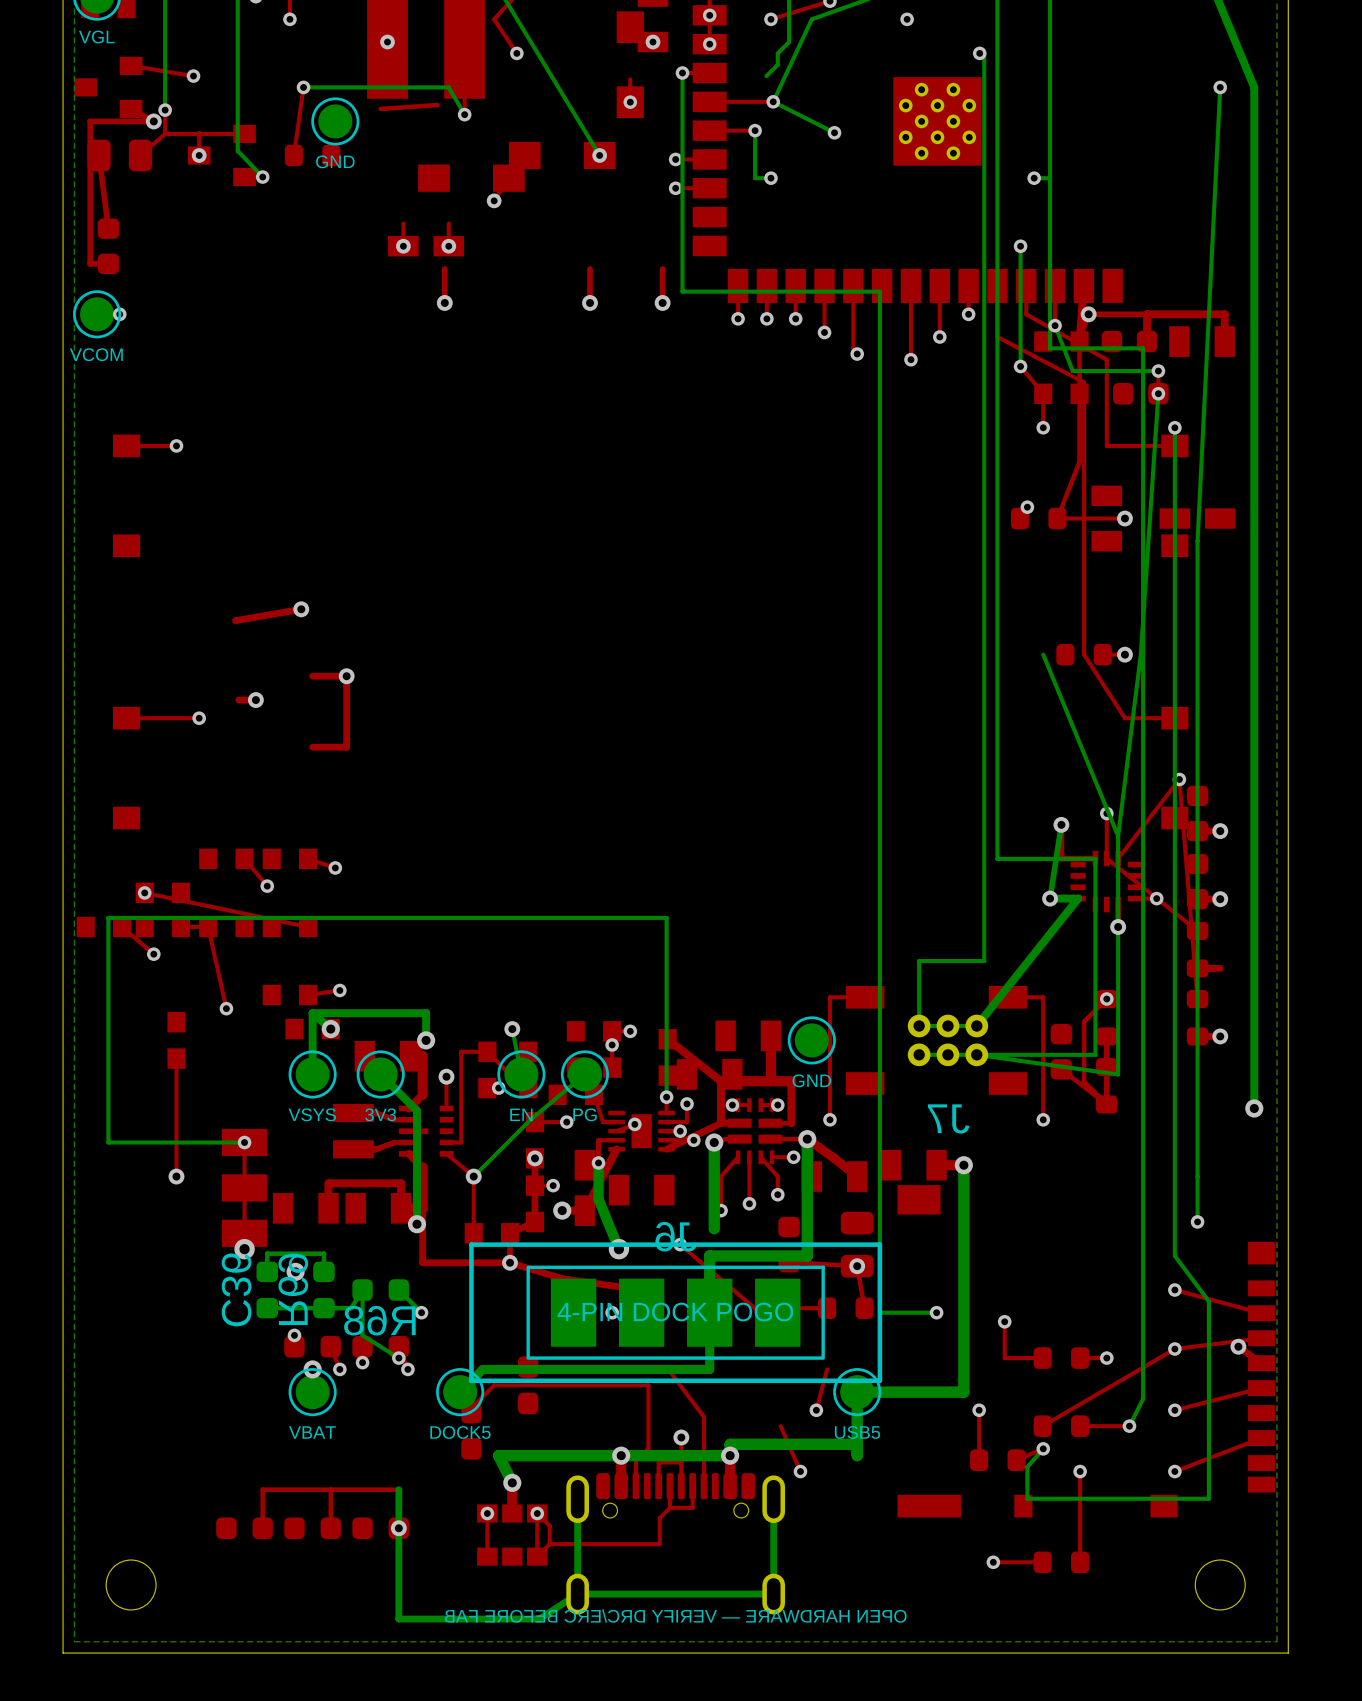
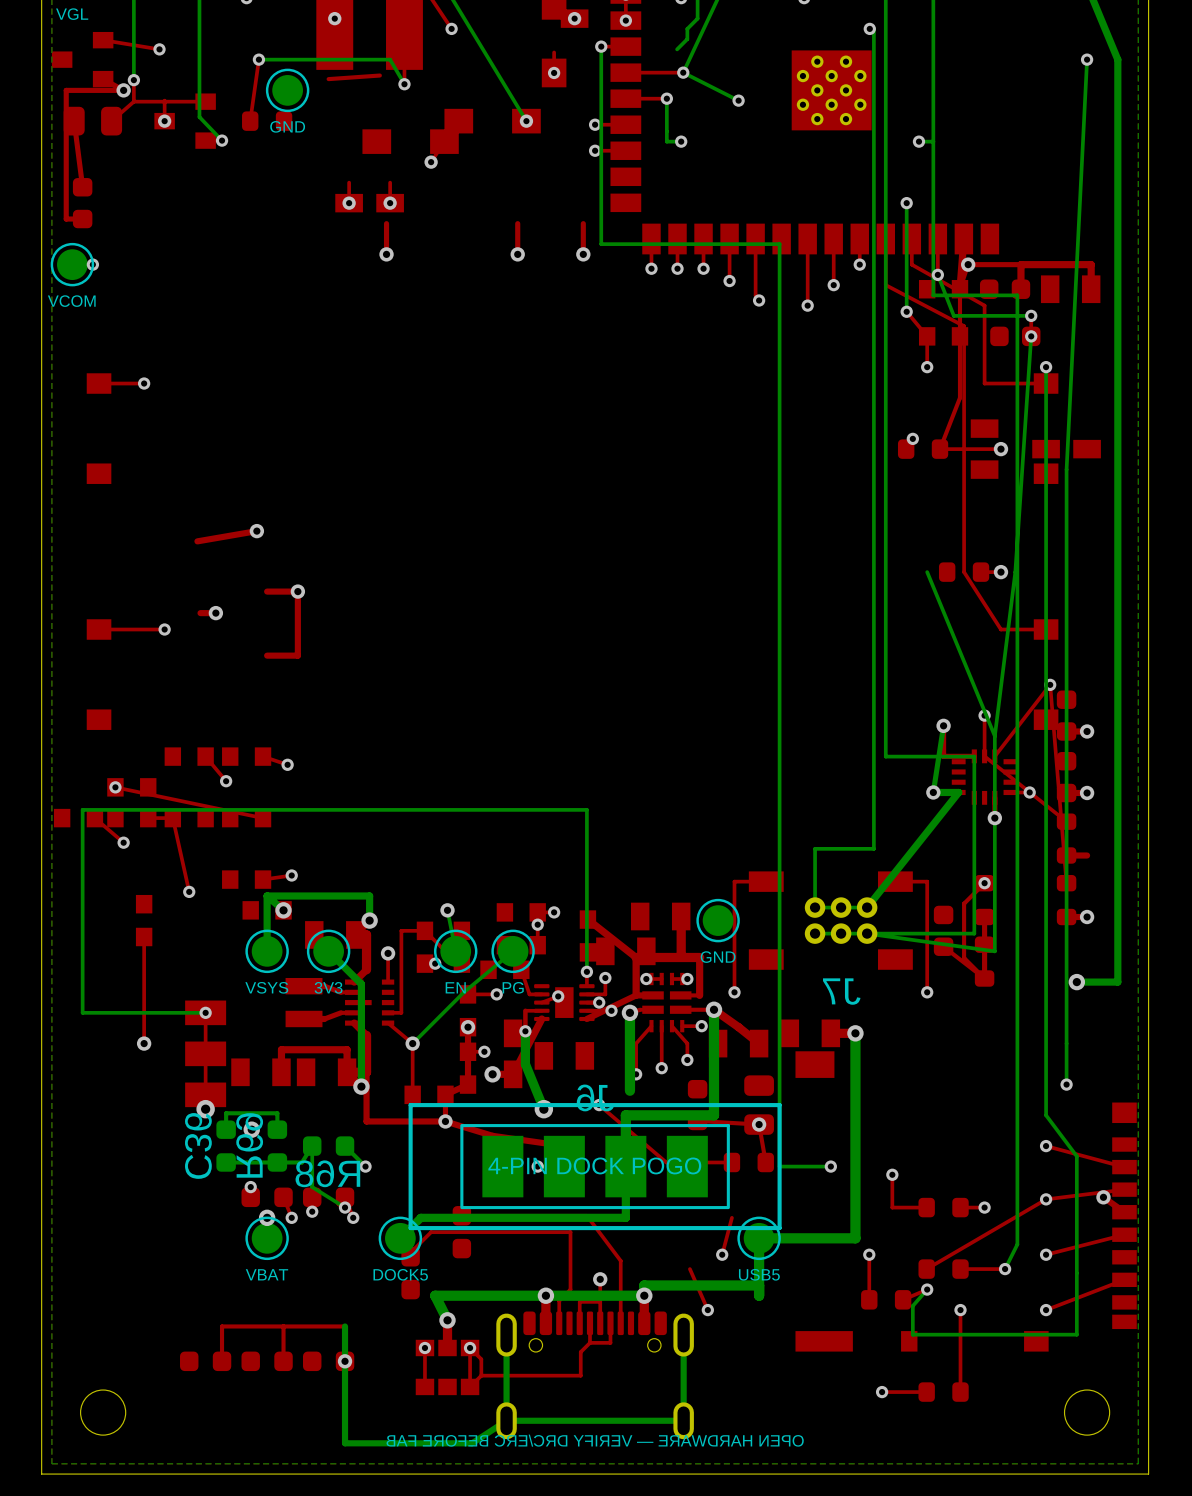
bottom track: none -> (1117, 982) (1076, 982)
via position: (1254, 1108) -> (1076, 982)

